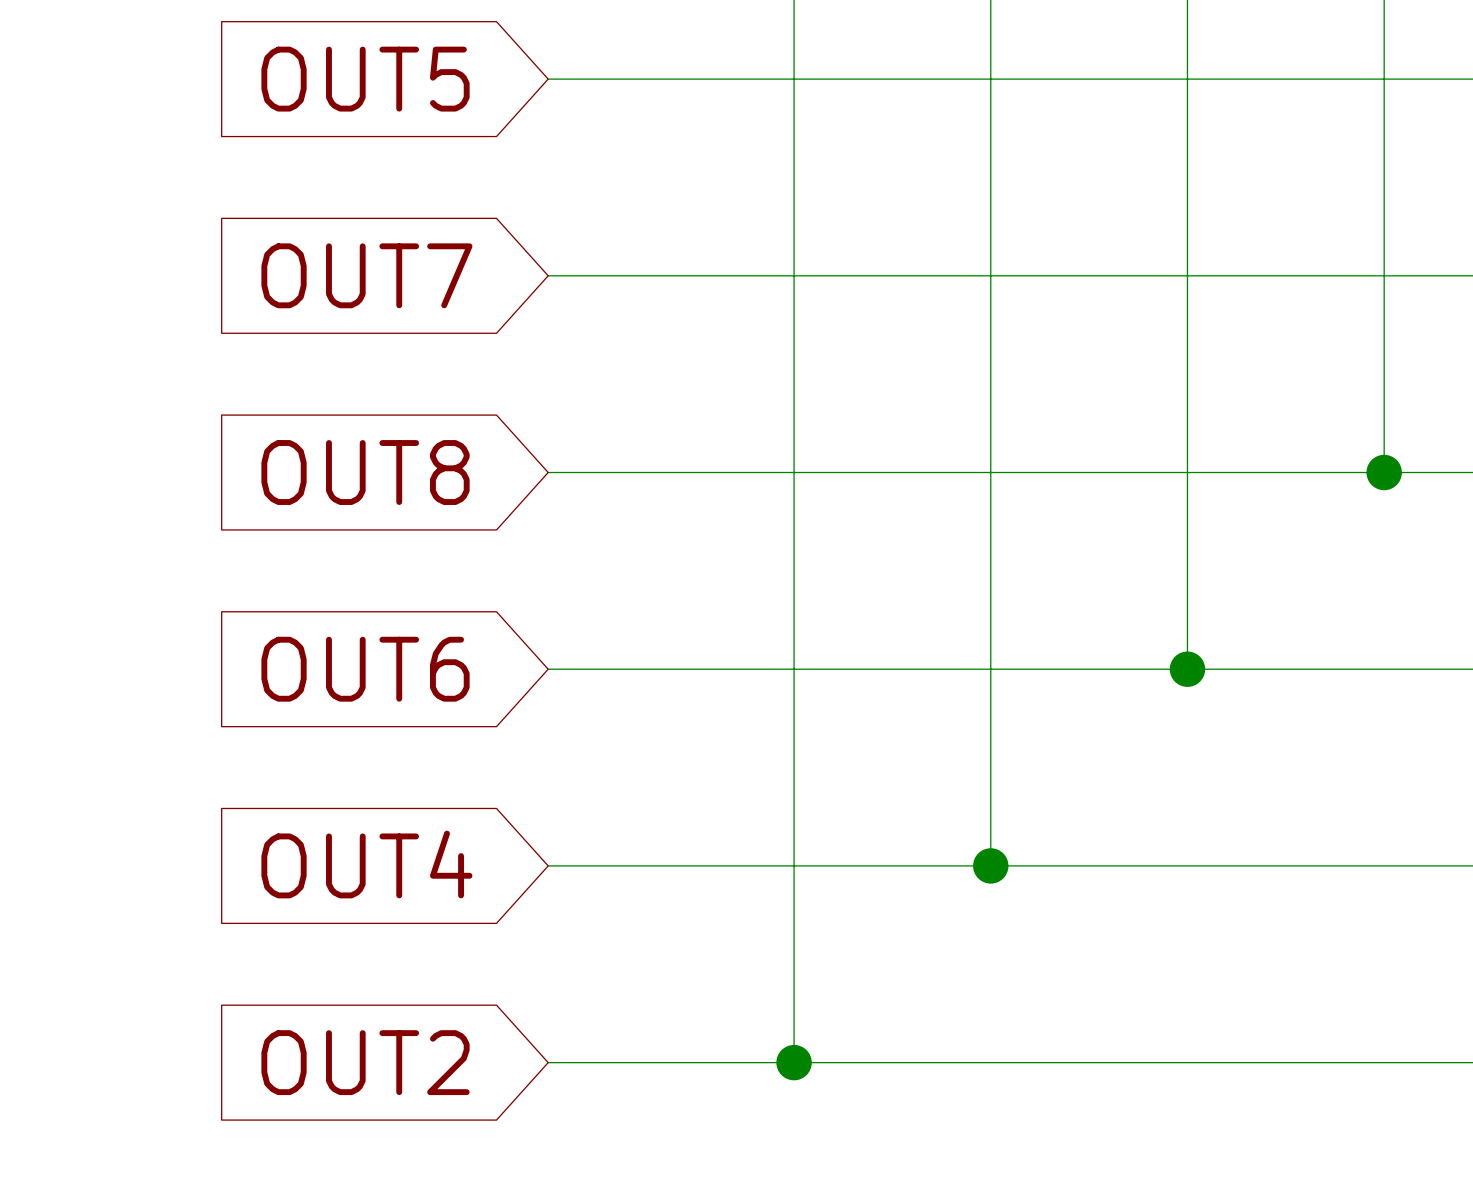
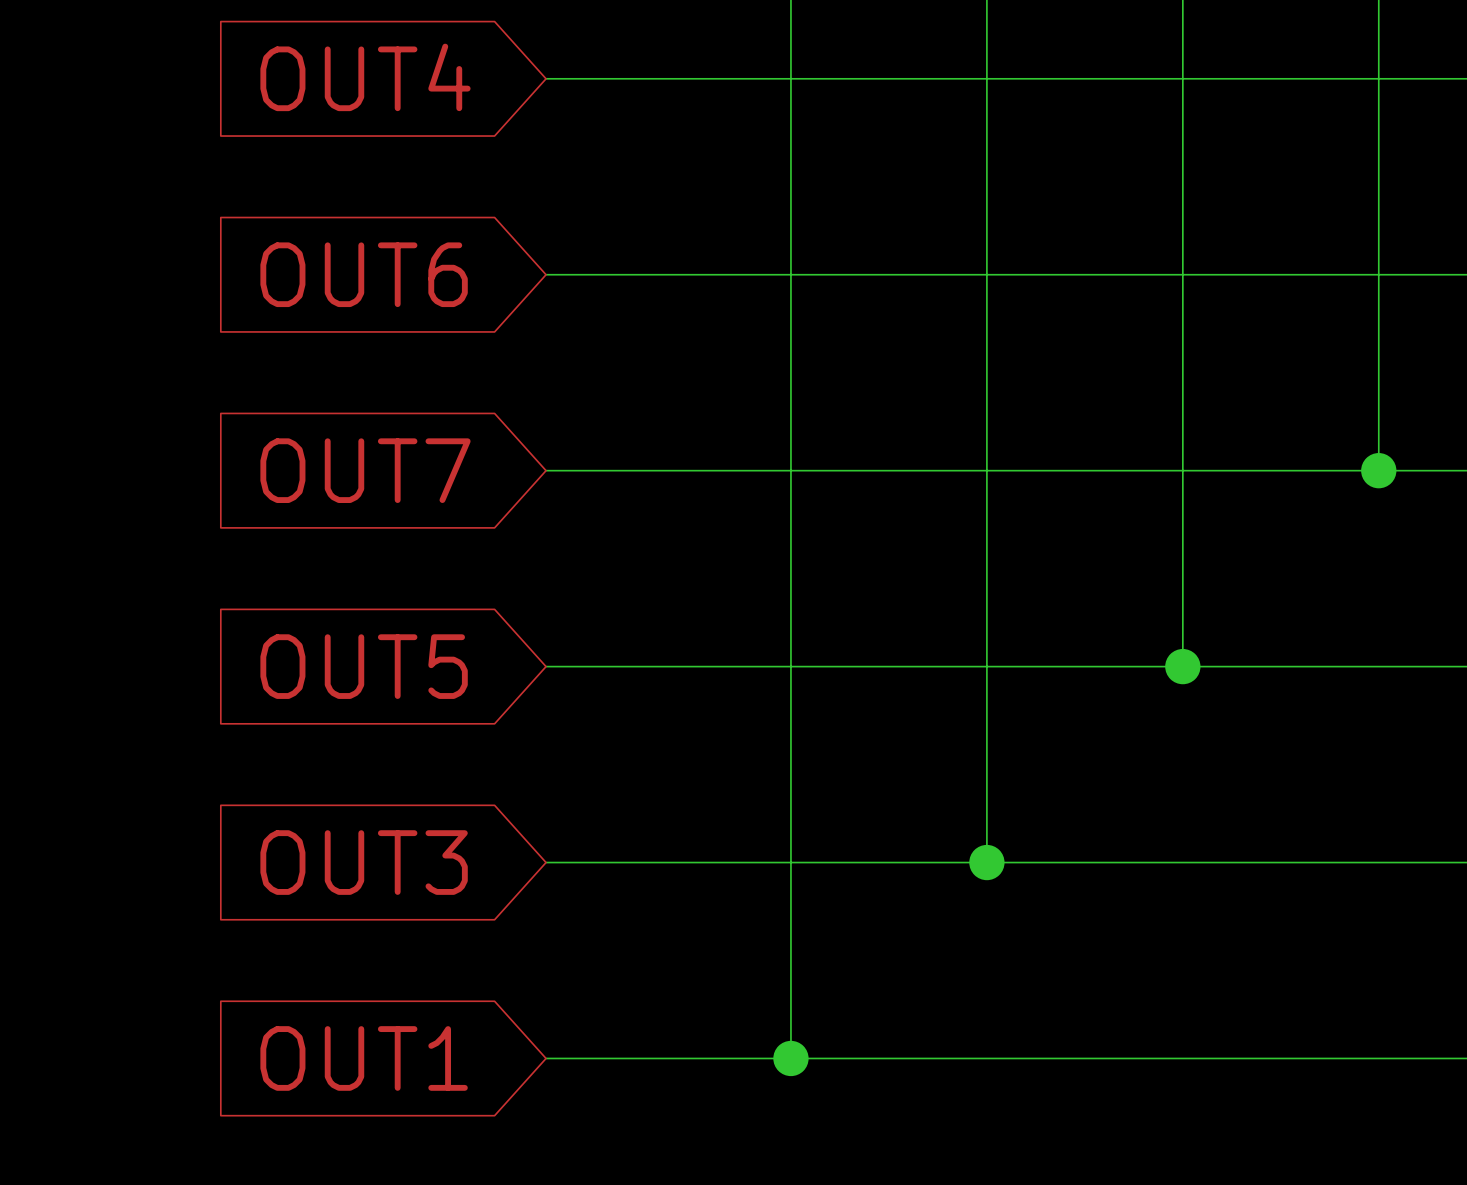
global label: OUT5 (365, 79) -> OUT4 (365, 77)
global label: OUT7 (366, 275) -> OUT6 (364, 274)
global label: OUT8 (365, 472) -> OUT7 (365, 470)
global label: OUT6 (365, 669) -> OUT5 (364, 666)
global label: OUT4 (366, 864) -> OUT3 (364, 862)
global label: OUT2 (365, 1062) -> OUT1 (364, 1058)

